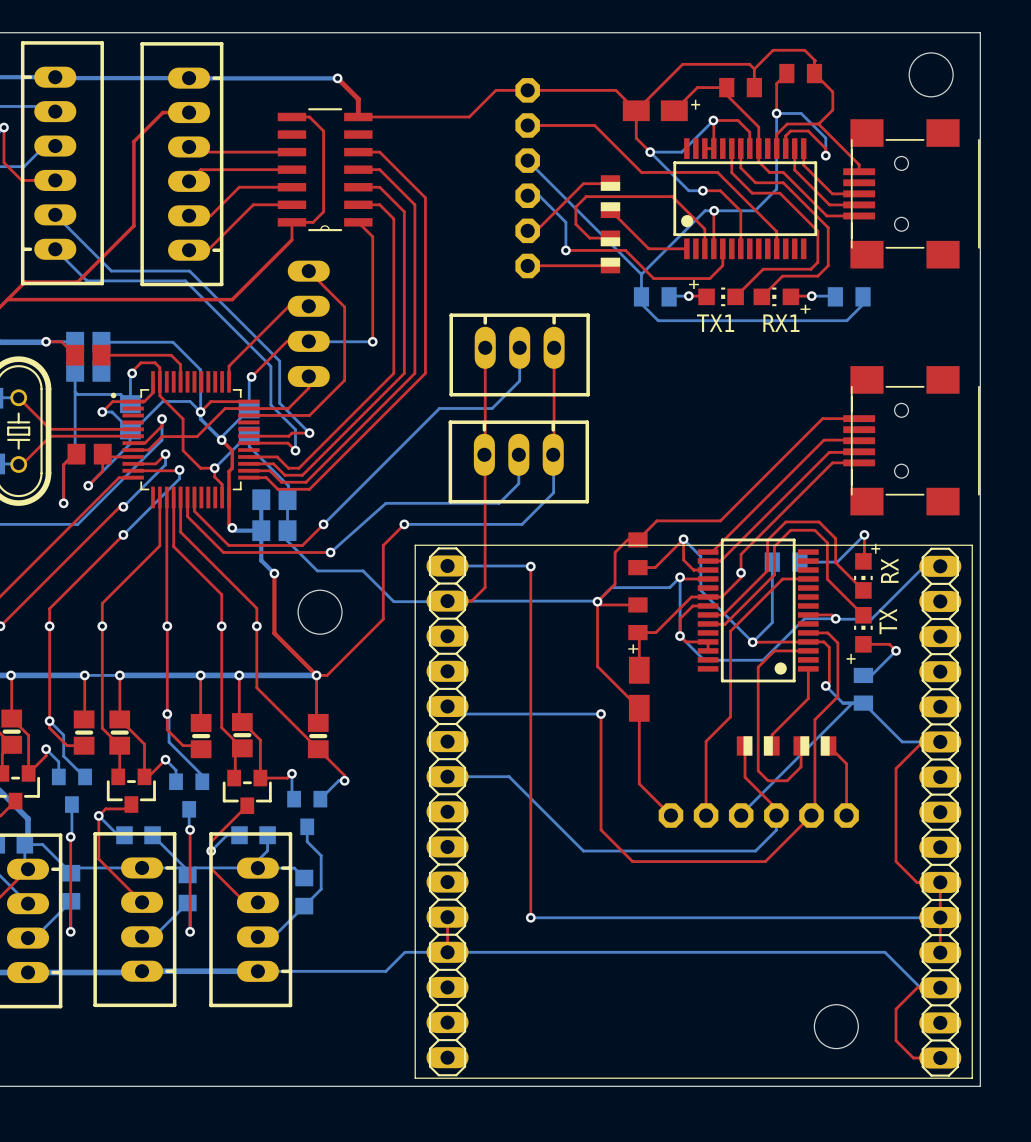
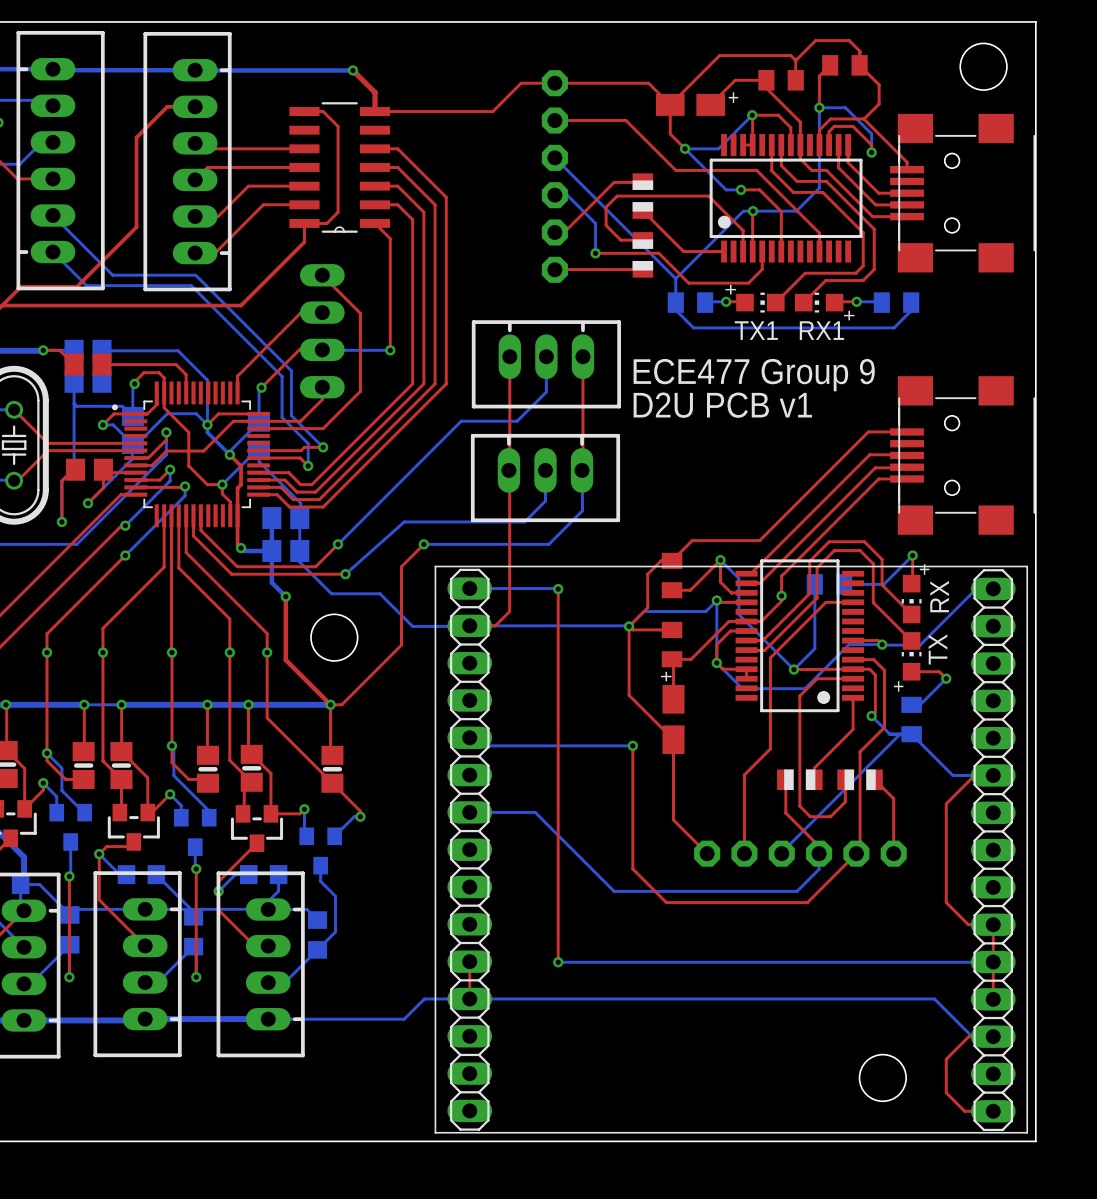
text: none -> ECE477 Group 9 (754, 375)
text: none -> D2U PCB v1 (722, 405)

